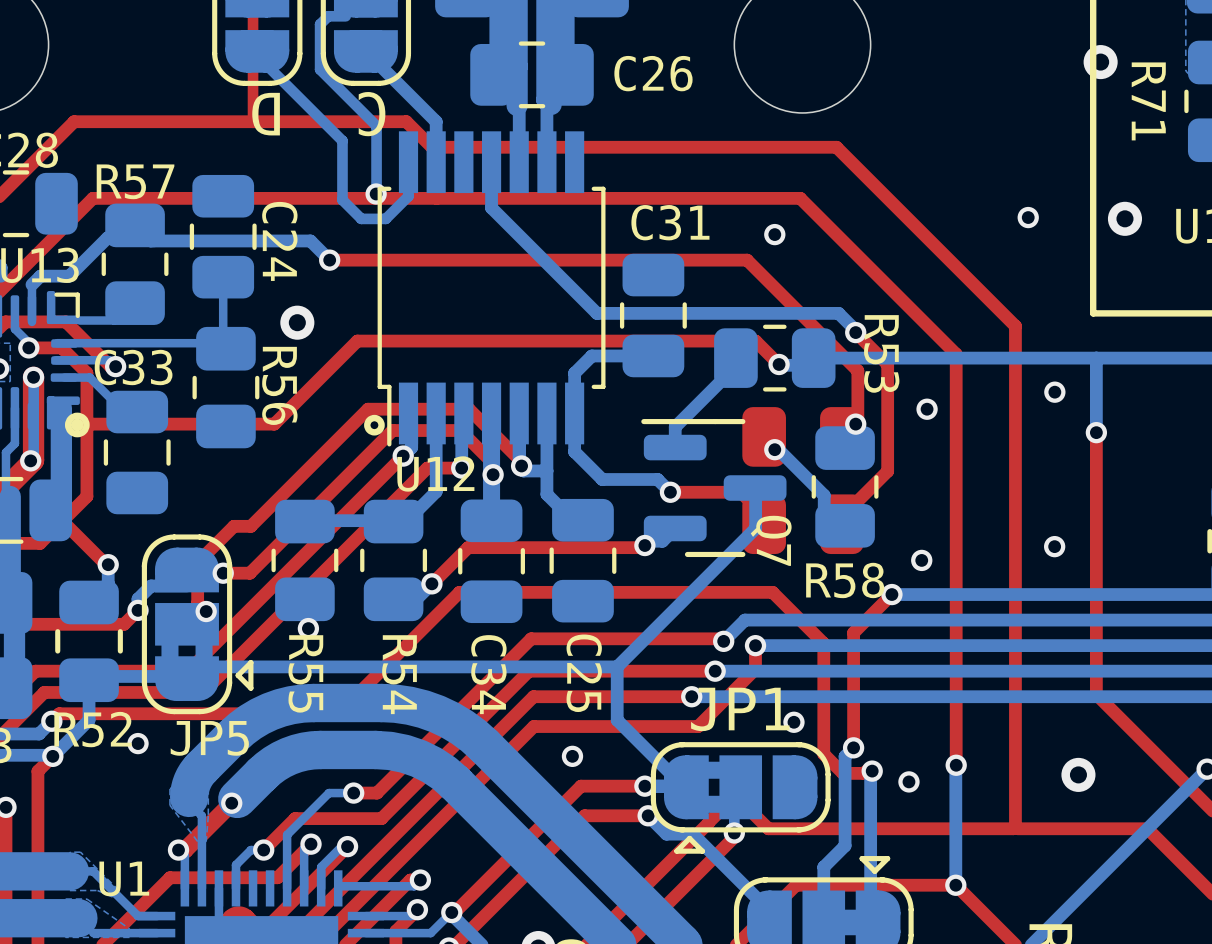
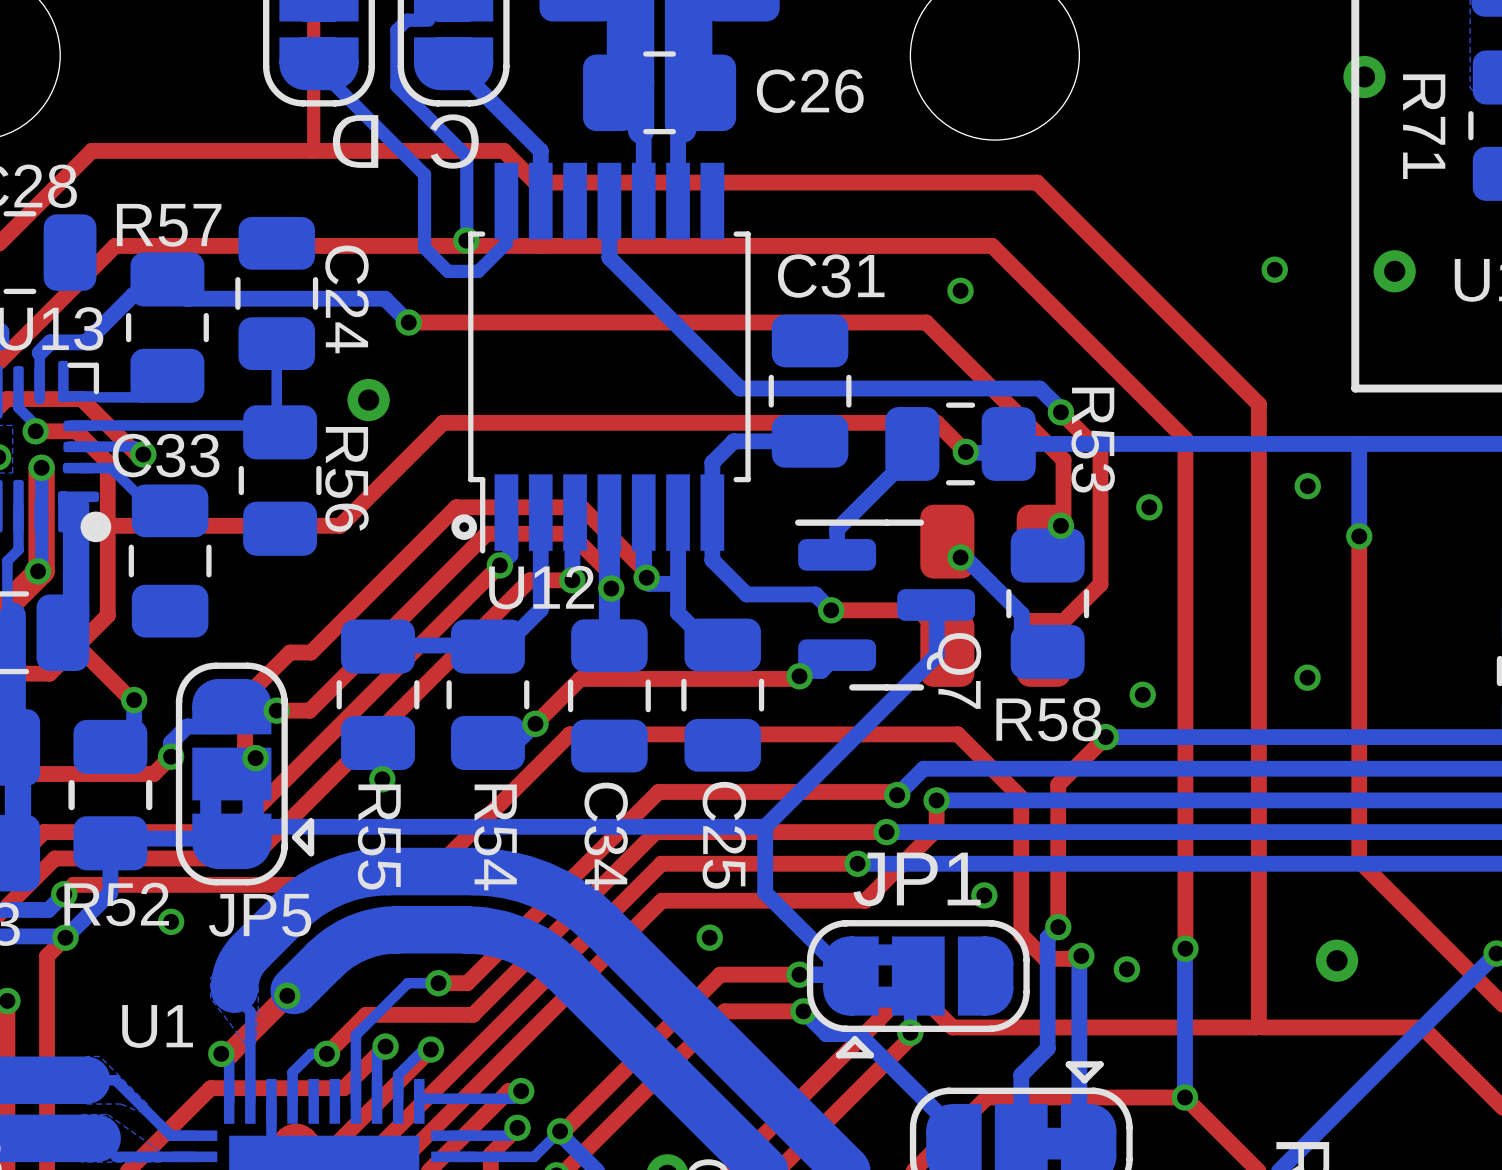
U1 name position: U1 (124, 878) -> U1 (157, 1026)

